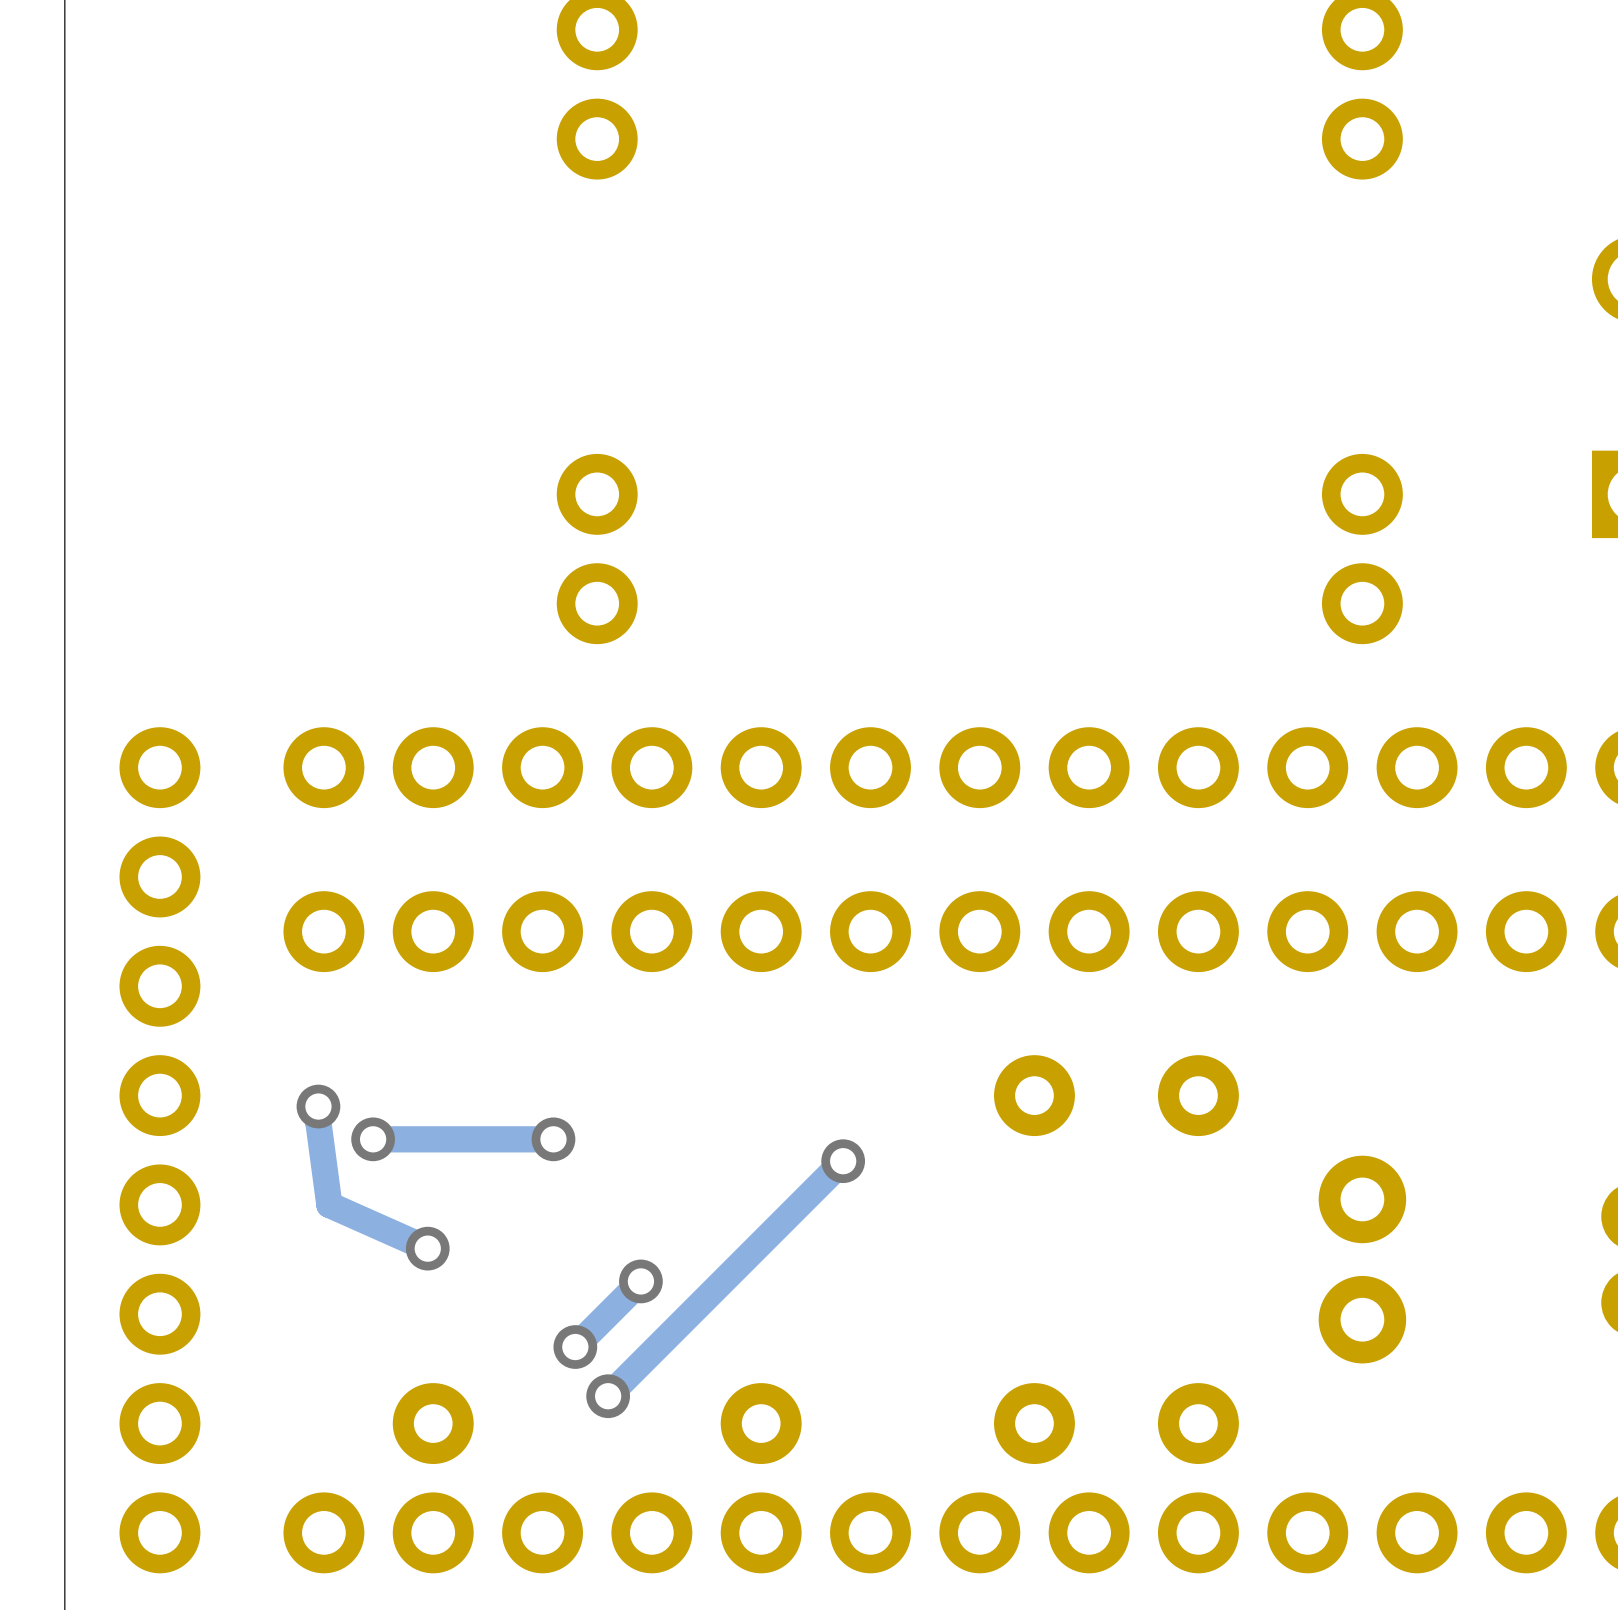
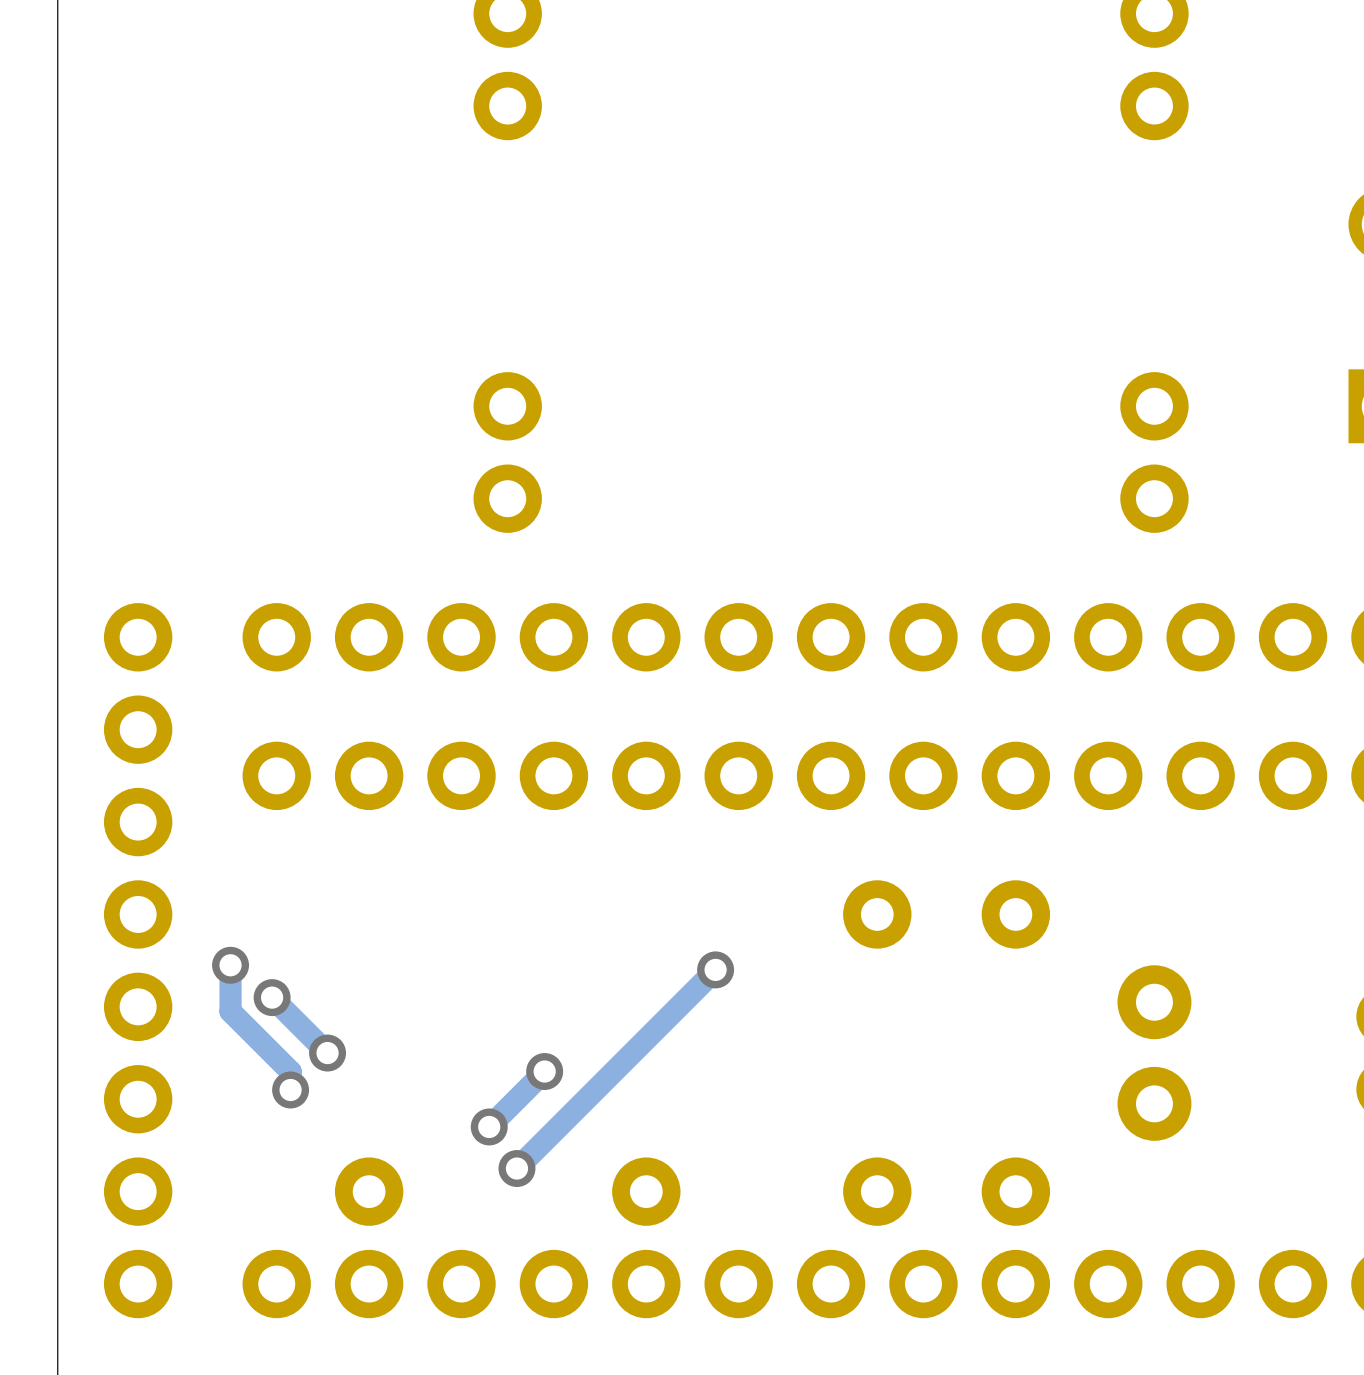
track: (318, 1106) (318, 1122) (329, 1204) (427, 1248) -> none
via: (318, 1106) -> none
via: (373, 1139) -> none
track: (553, 1139) (373, 1139) -> none
via: (553, 1139) -> none
track: none -> (230, 965) (230, 1011) (290, 1071) (290, 1090)
via: none -> (230, 965)
track: none -> (272, 997) (327, 1053)
via: none -> (272, 997)
via position: (427, 1248) -> (327, 1053)
via: none -> (290, 1090)

